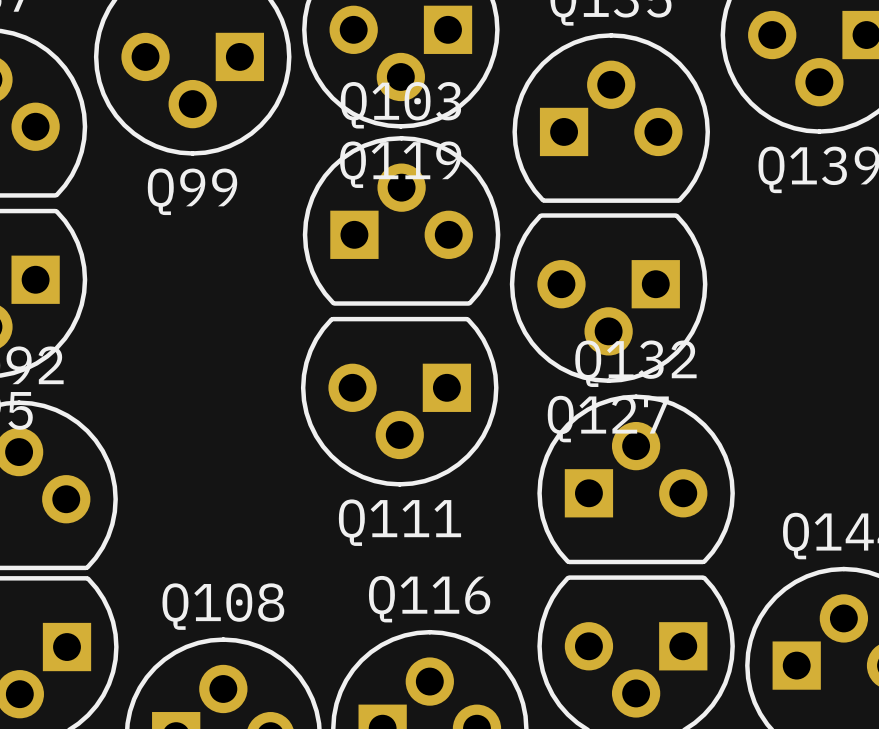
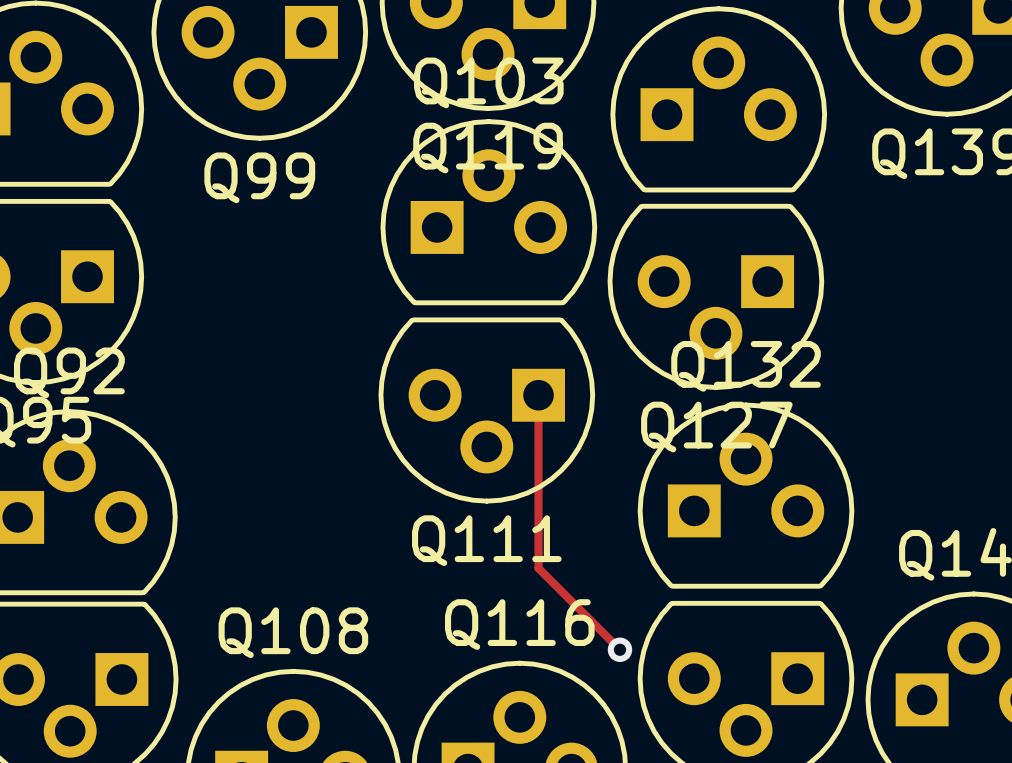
track: none -> (538, 395) (538, 568) (619, 649)
via: none -> (619, 649)

